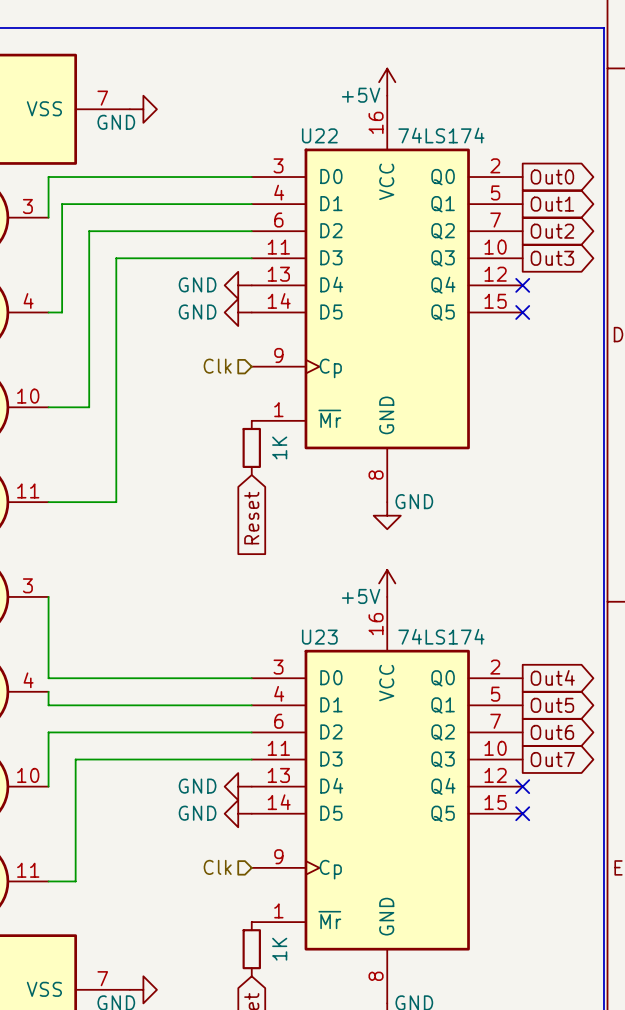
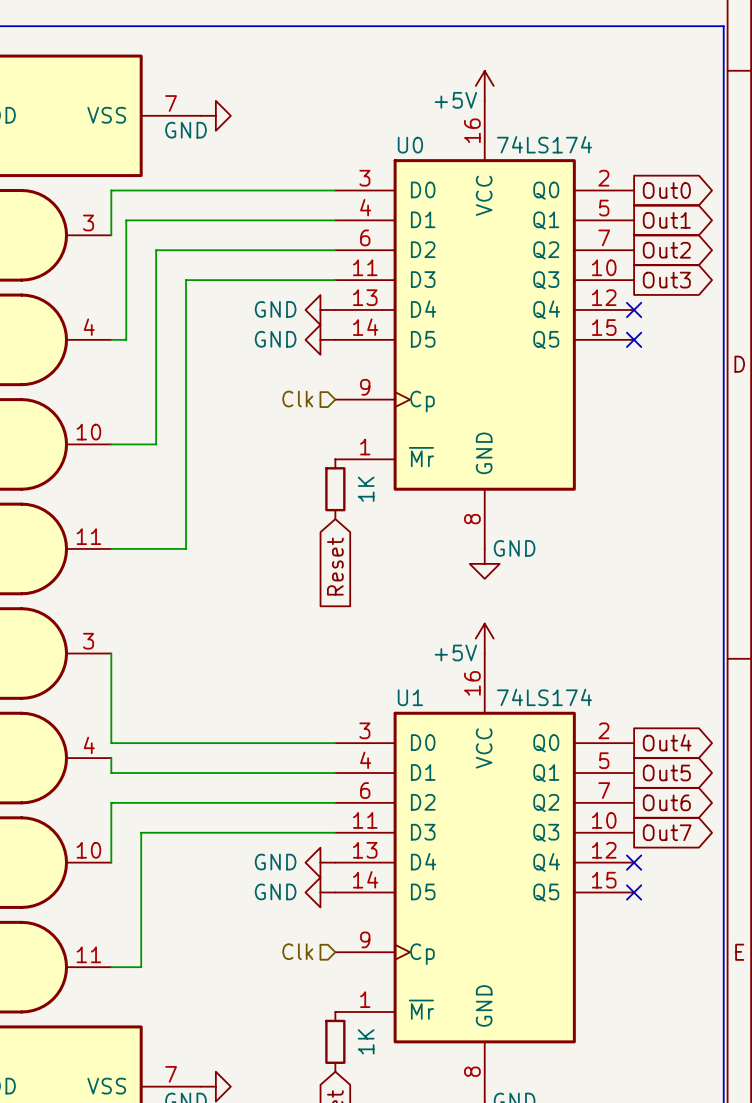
U22 name: U22 (319, 135) -> U0 (410, 145)
U23 name: U23 (319, 637) -> U1 (410, 697)

